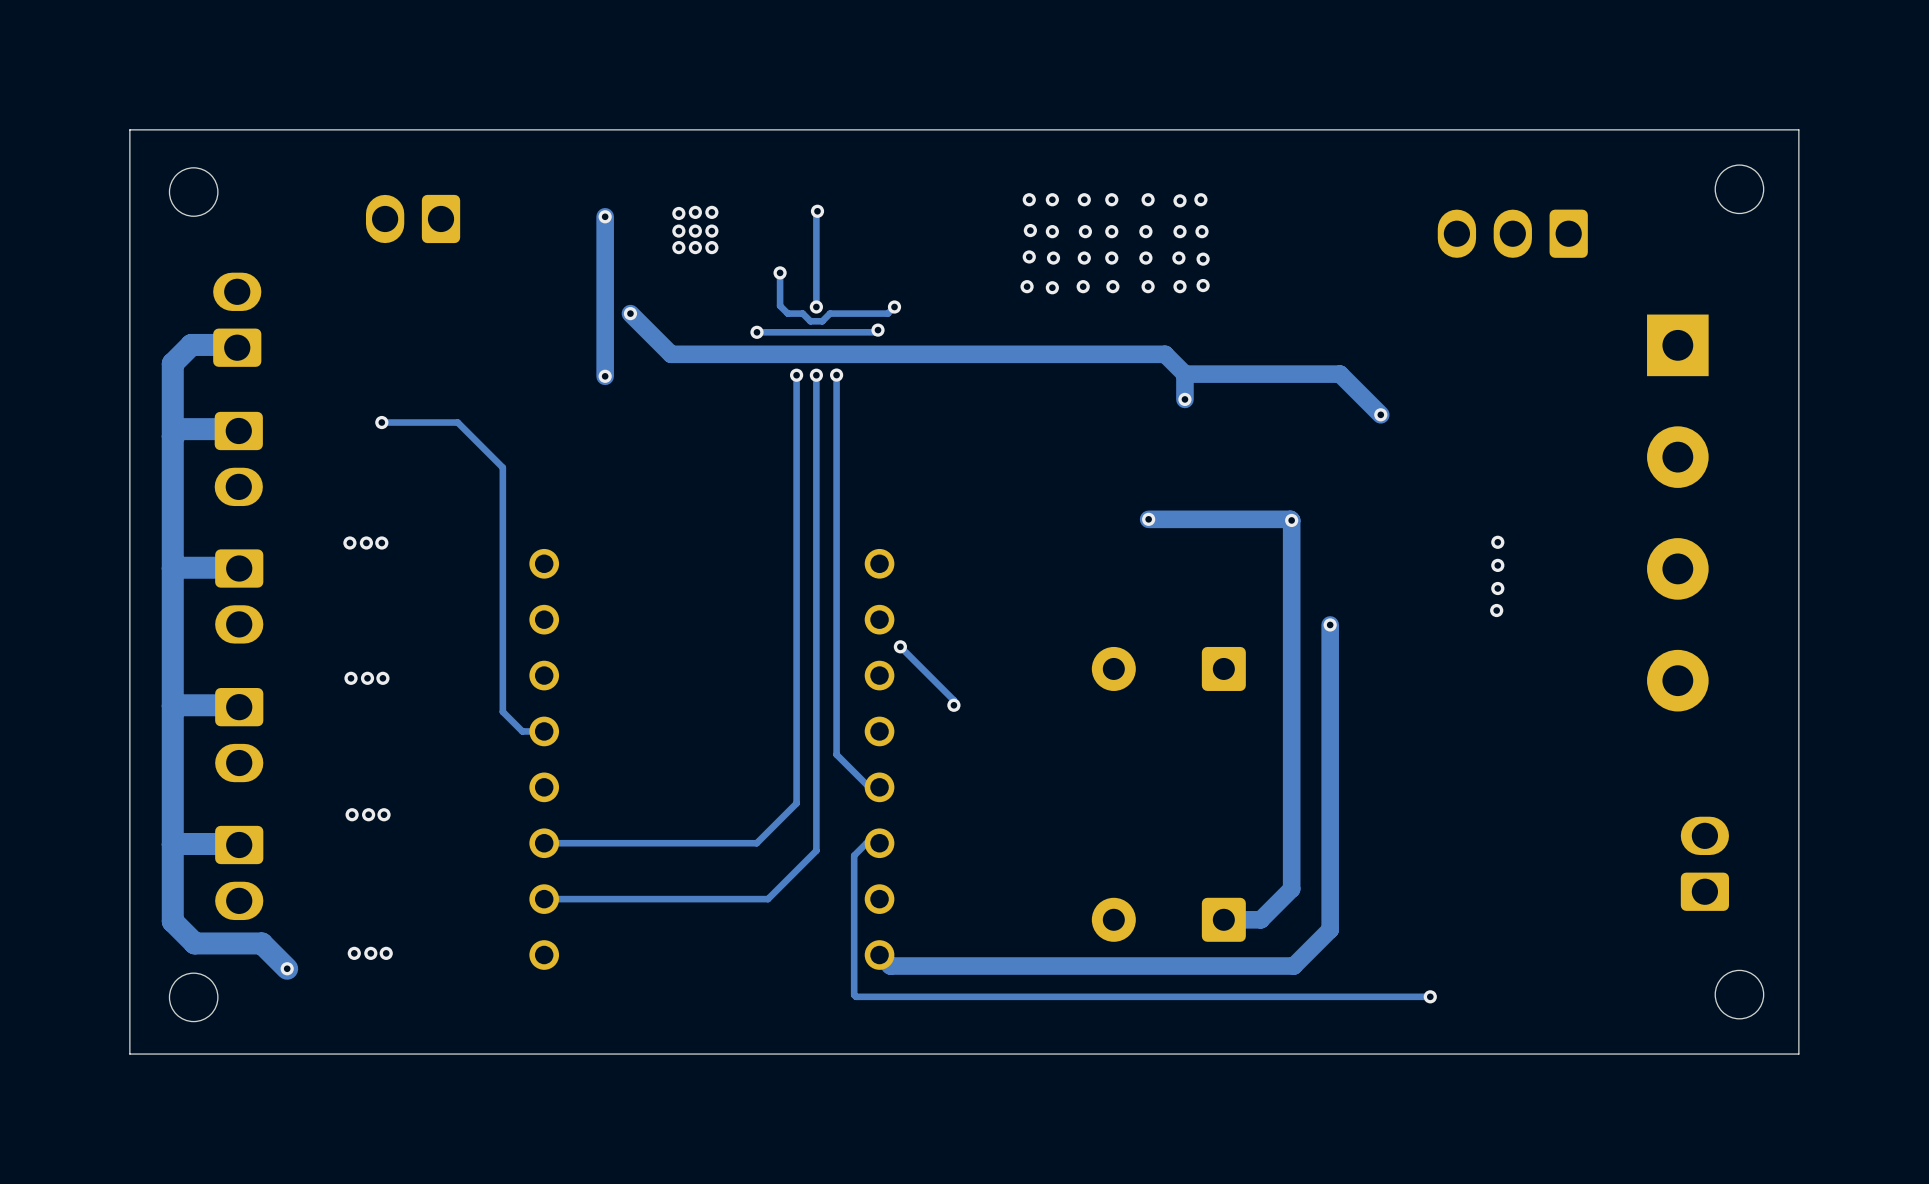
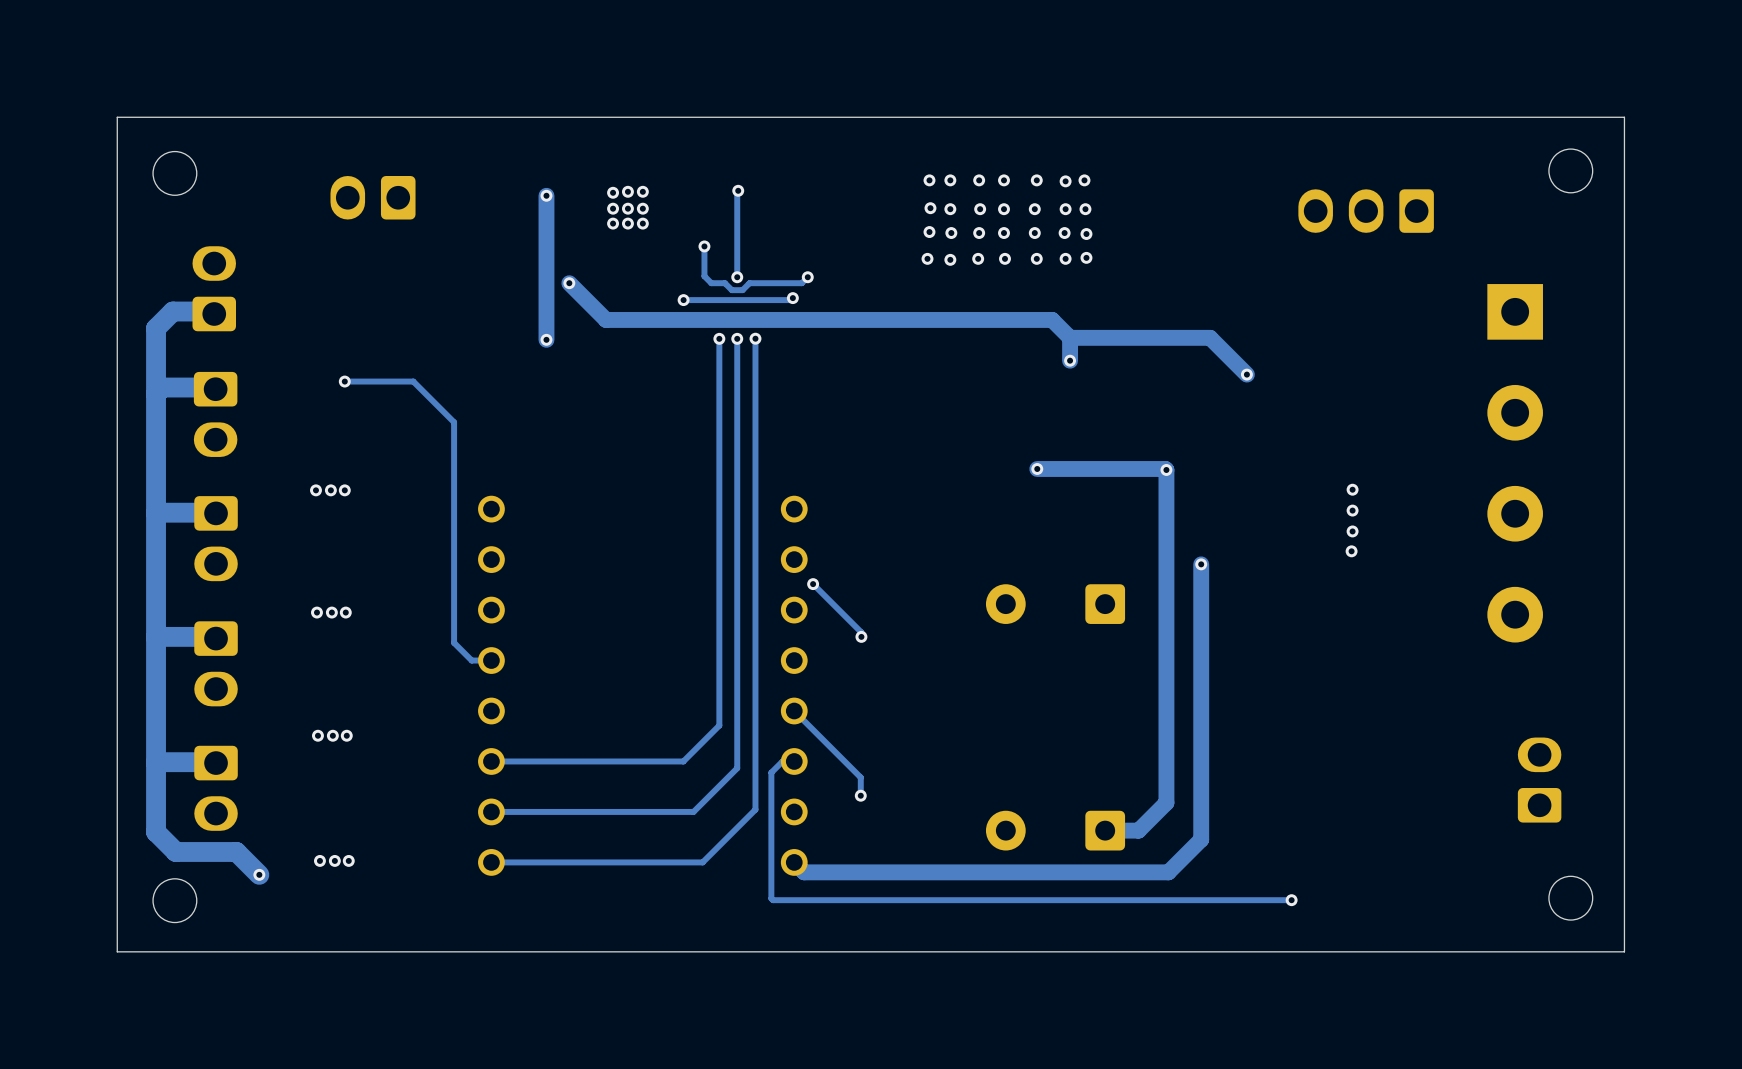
track: (836, 754) (869, 787) (879, 787) -> (860, 795) (860, 777) (794, 711)
track: none -> (755, 681) (755, 809) (702, 862) (491, 862)
via: none -> (860, 795)

